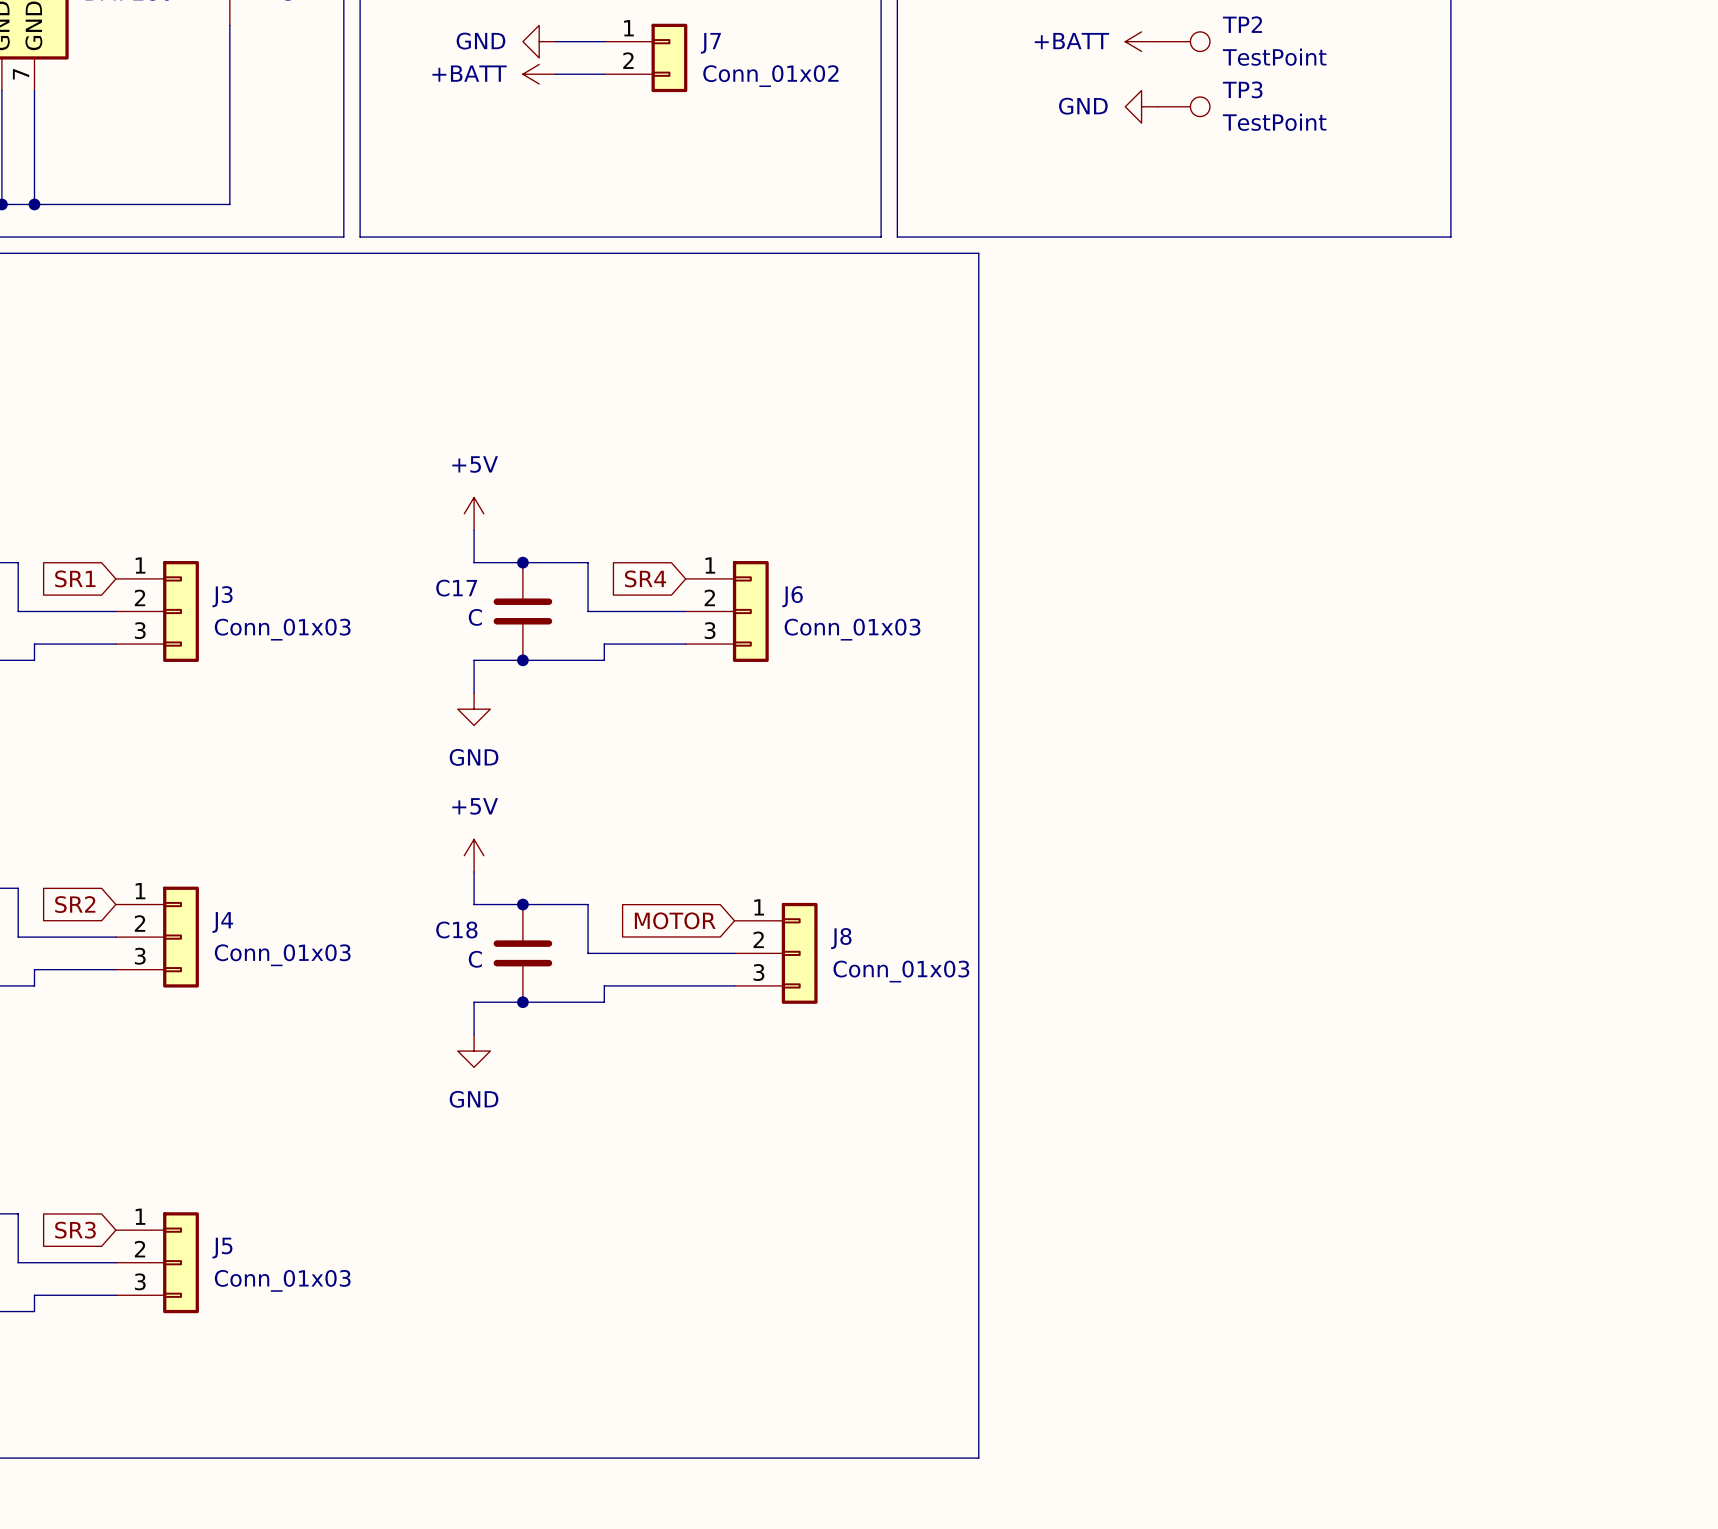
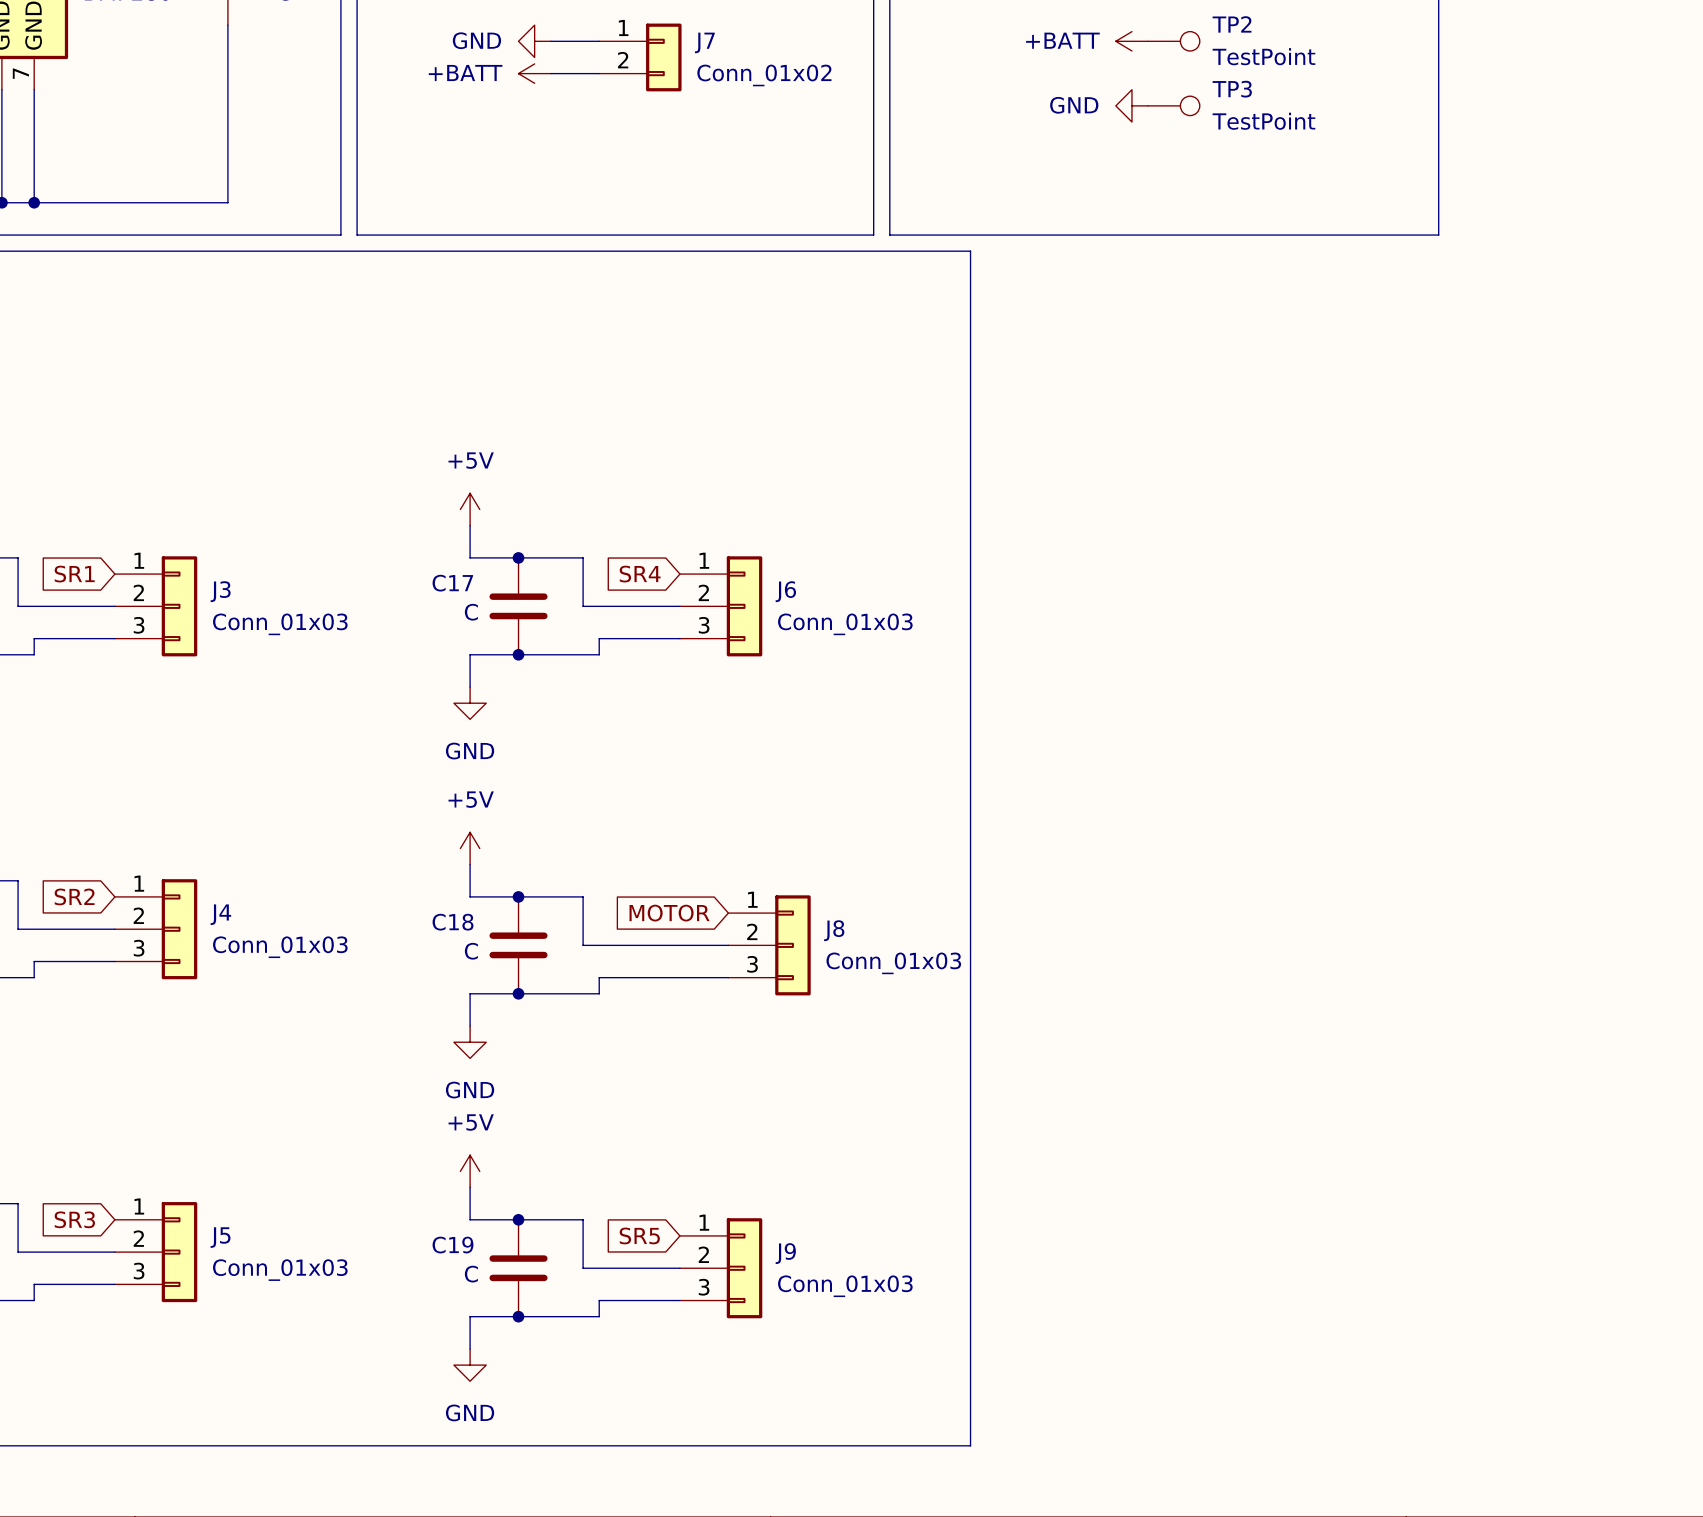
power symbol: none -> +5V (470, 1171)
wire: none -> (470, 1187) (470, 1219) (583, 1219) (583, 1268) (679, 1268)
junction: none -> (518, 1219)
global label: none -> SR5 (639, 1235)
C19: none -> C (518, 1268)
J9: none -> Conn_01x03 (721, 1268)
wire: none -> (679, 1300) (599, 1300) (599, 1316) (470, 1316) (470, 1348)
junction: none -> (518, 1316)
power symbol: none -> GND (470, 1365)

